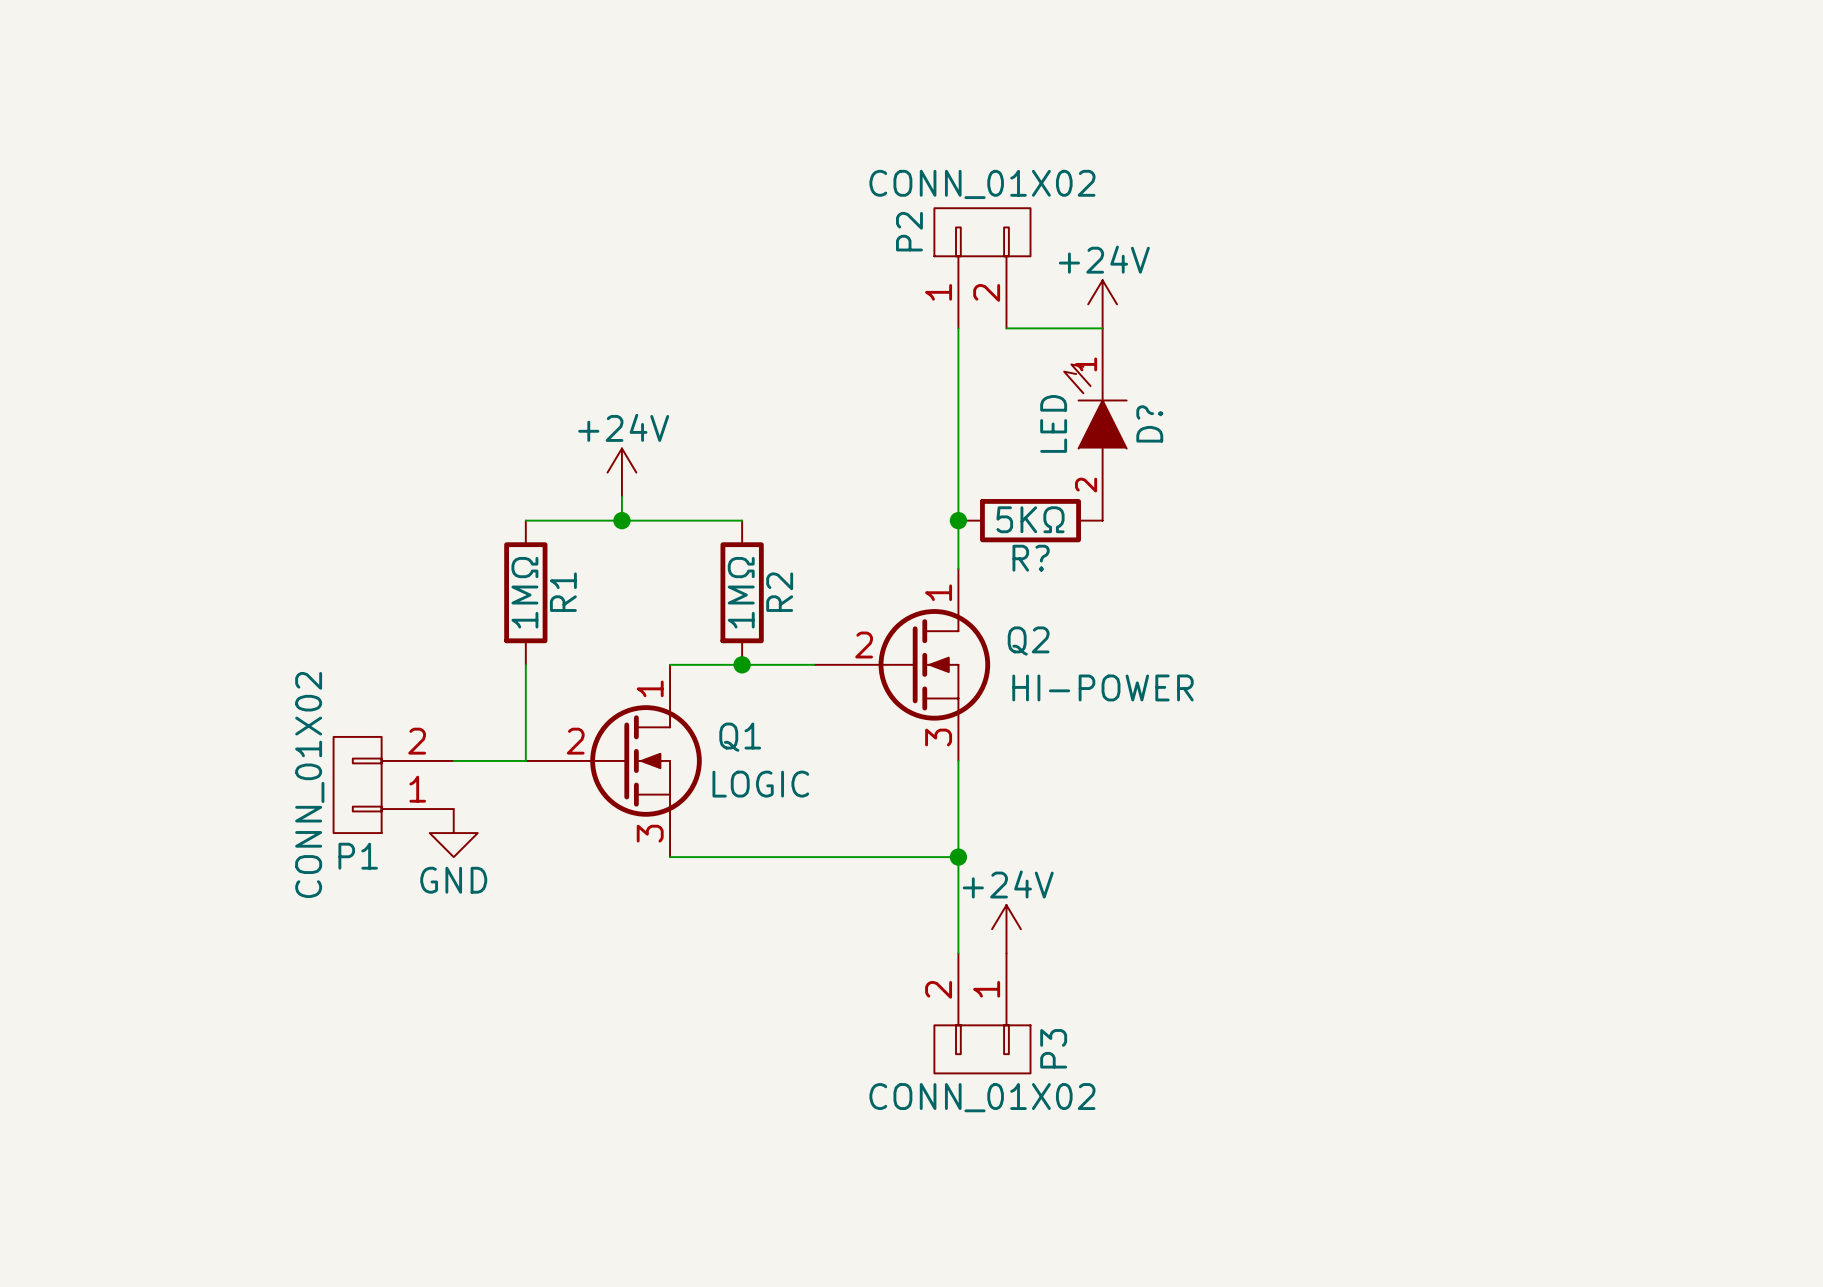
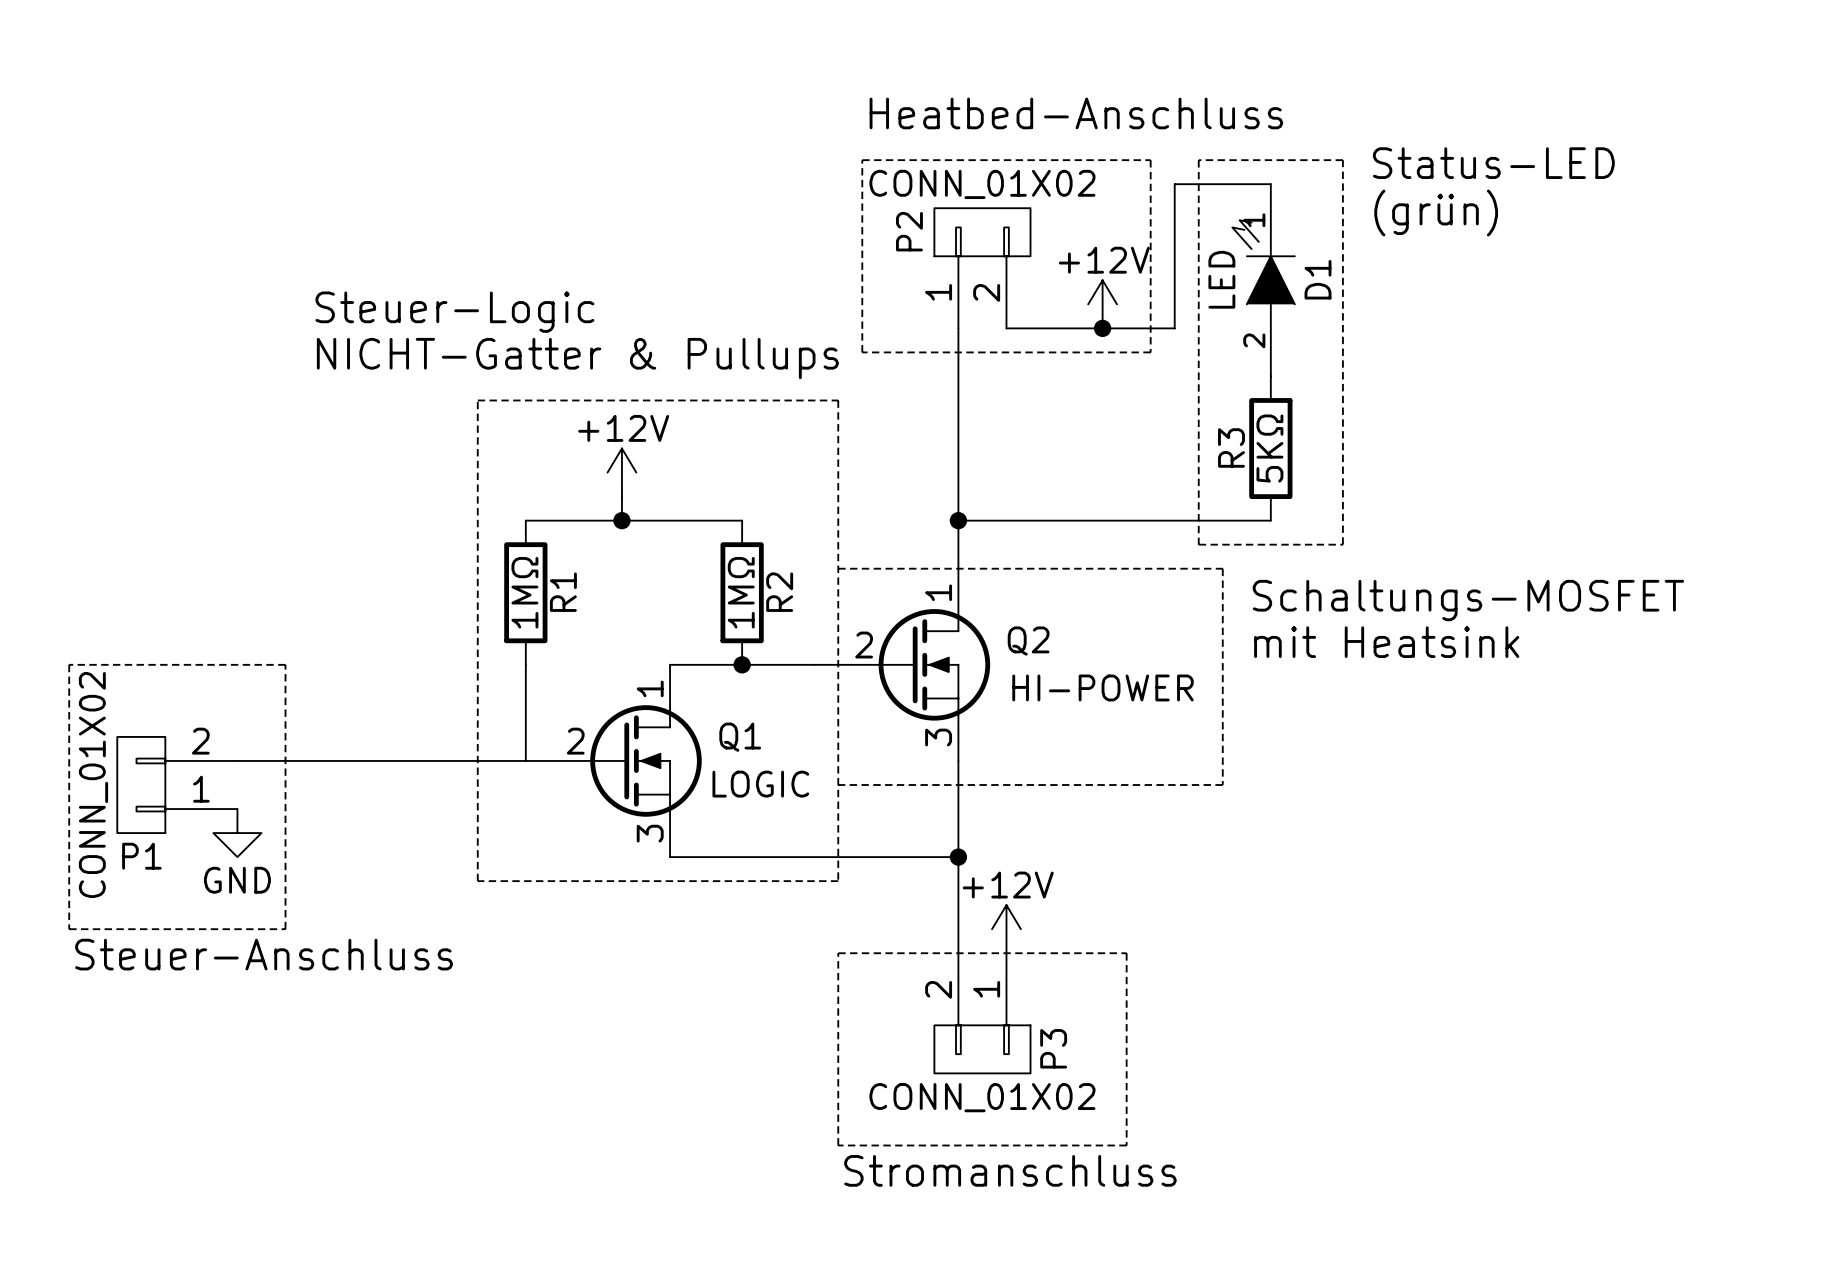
text: none -> Heatbed-Anschluss (1076, 113)
line: none -> (862, 160) (1150, 160) (1150, 352) (862, 352) (862, 160)
line: none -> (1198, 160) (1342, 160) (1342, 544) (1198, 544) (1198, 160)
text: none -> Status-LED (1493, 163)
wire: none -> (1270, 184) (1174, 184) (1174, 328) (1102, 328)
text: none -> (grün) (1436, 213)
D1: none -> LED (1263, 280)
power symbol: +24V (1102, 304) -> +12V (1102, 304)
text: none -> Steuer-Logic (454, 312)
junction: none -> (1102, 328)
text: none -> NICHT-Gatter & Pullups (577, 358)
line: none -> (477, 400) (838, 400) (838, 881) (477, 881) (477, 400)
D?: LED (1095, 424) -> none
R3: none -> 5KΩ (1270, 448)
power symbol: +24V (621, 472) -> +12V (621, 472)
wire: none -> (958, 520) (1270, 520)
R?: 5KΩ (1030, 520) -> none
line: none -> (838, 568) (1222, 568) (1222, 785) (838, 785)
text: none -> Schaltungs-MOSFET (1468, 600)
text: none -> mit Heatsink (1386, 642)
line: none -> (69, 664) (69, 929) (285, 929) (285, 664) (69, 664)
wire: none -> (237, 760) (453, 760)
P1 position: (393, 785) -> (177, 785)
power symbol position: GND (453, 833) -> GND (237, 833)
power symbol: +24V (1006, 929) -> +12V (1006, 929)
line: none -> (838, 953) (838, 1145) (1126, 1145) (1126, 953) (838, 953)
text: none -> Steuer-Anschluss (264, 954)
text: none -> Stromanschluss (1010, 1170)

